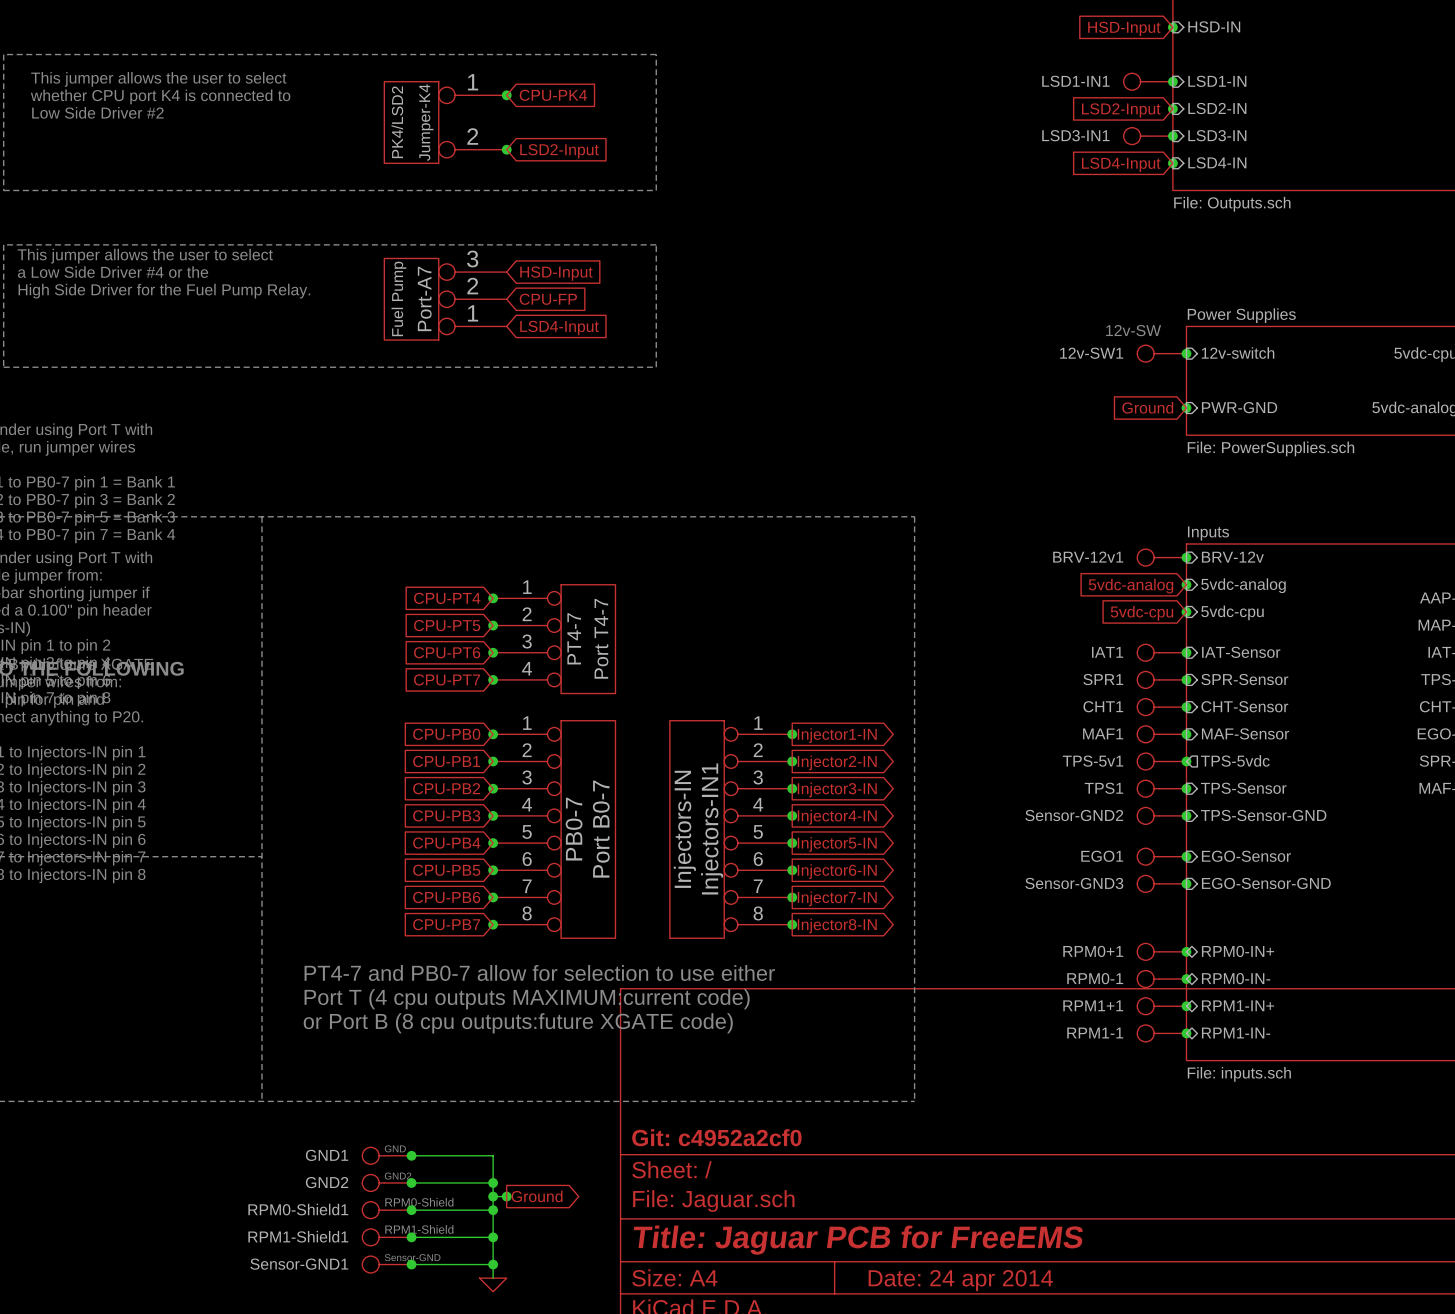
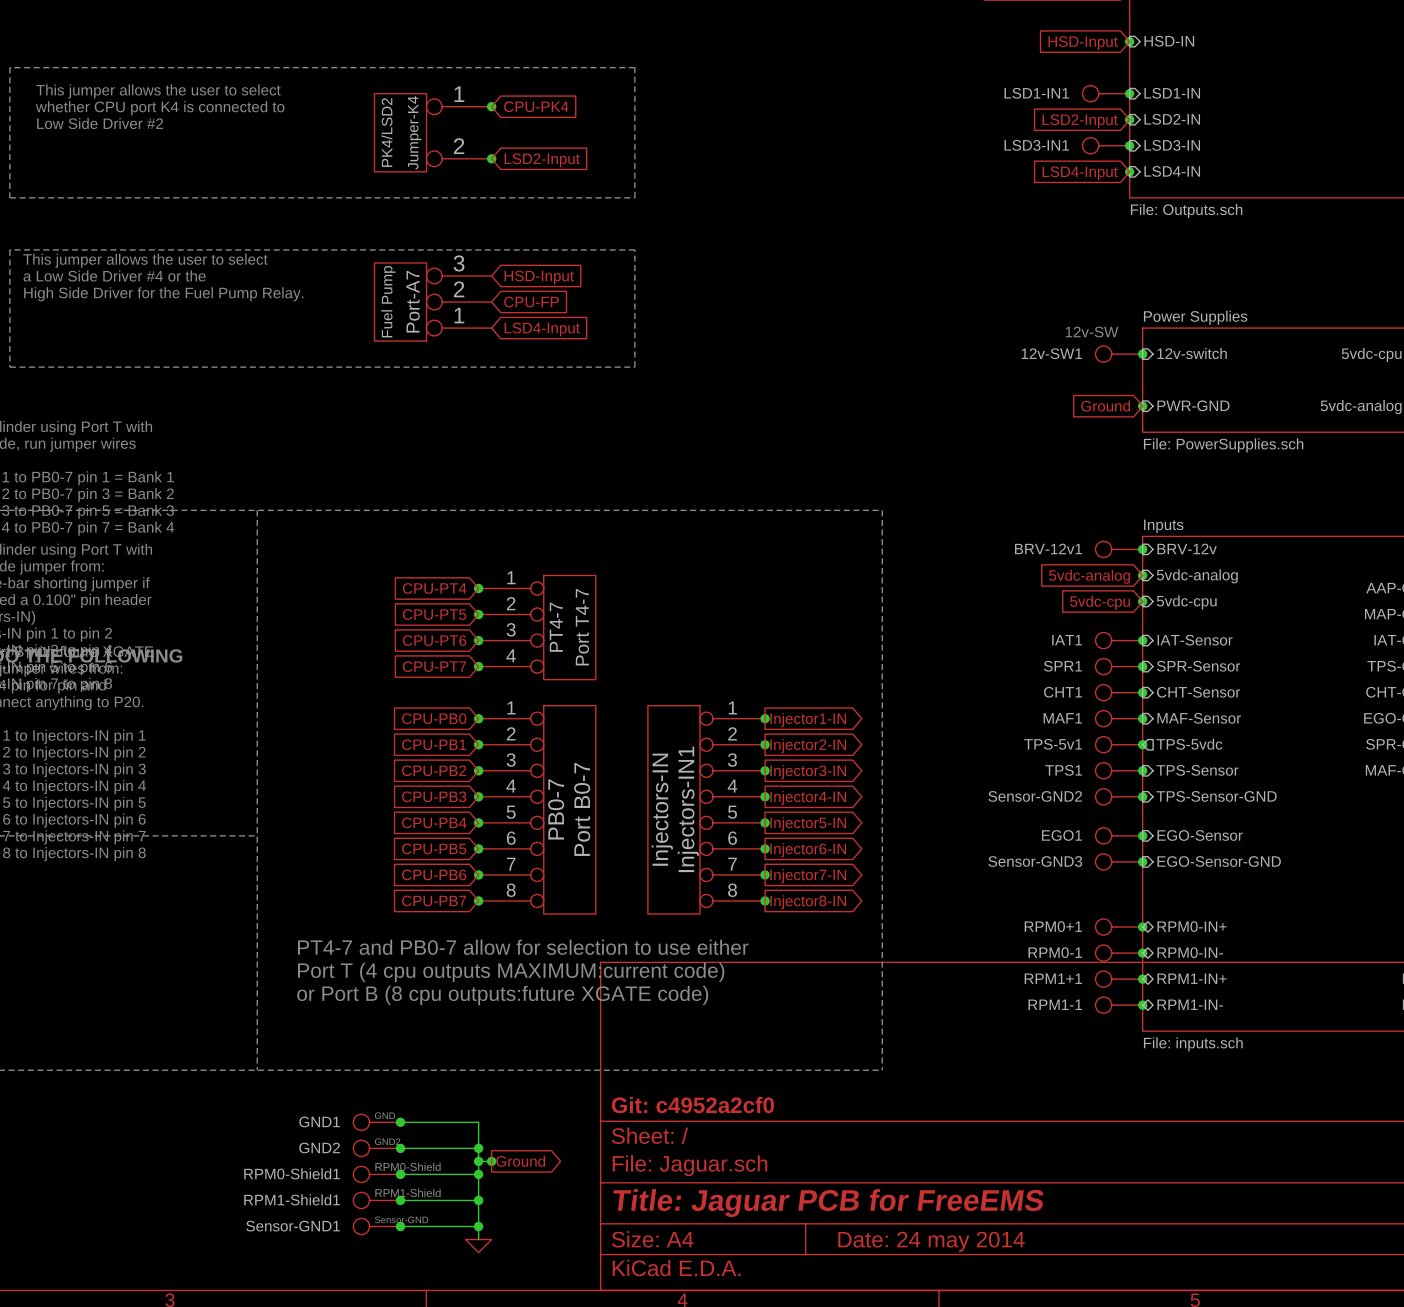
title block: Date: 24 apr 2014 (960, 1280) -> Date: 24 may 2014 (931, 1241)

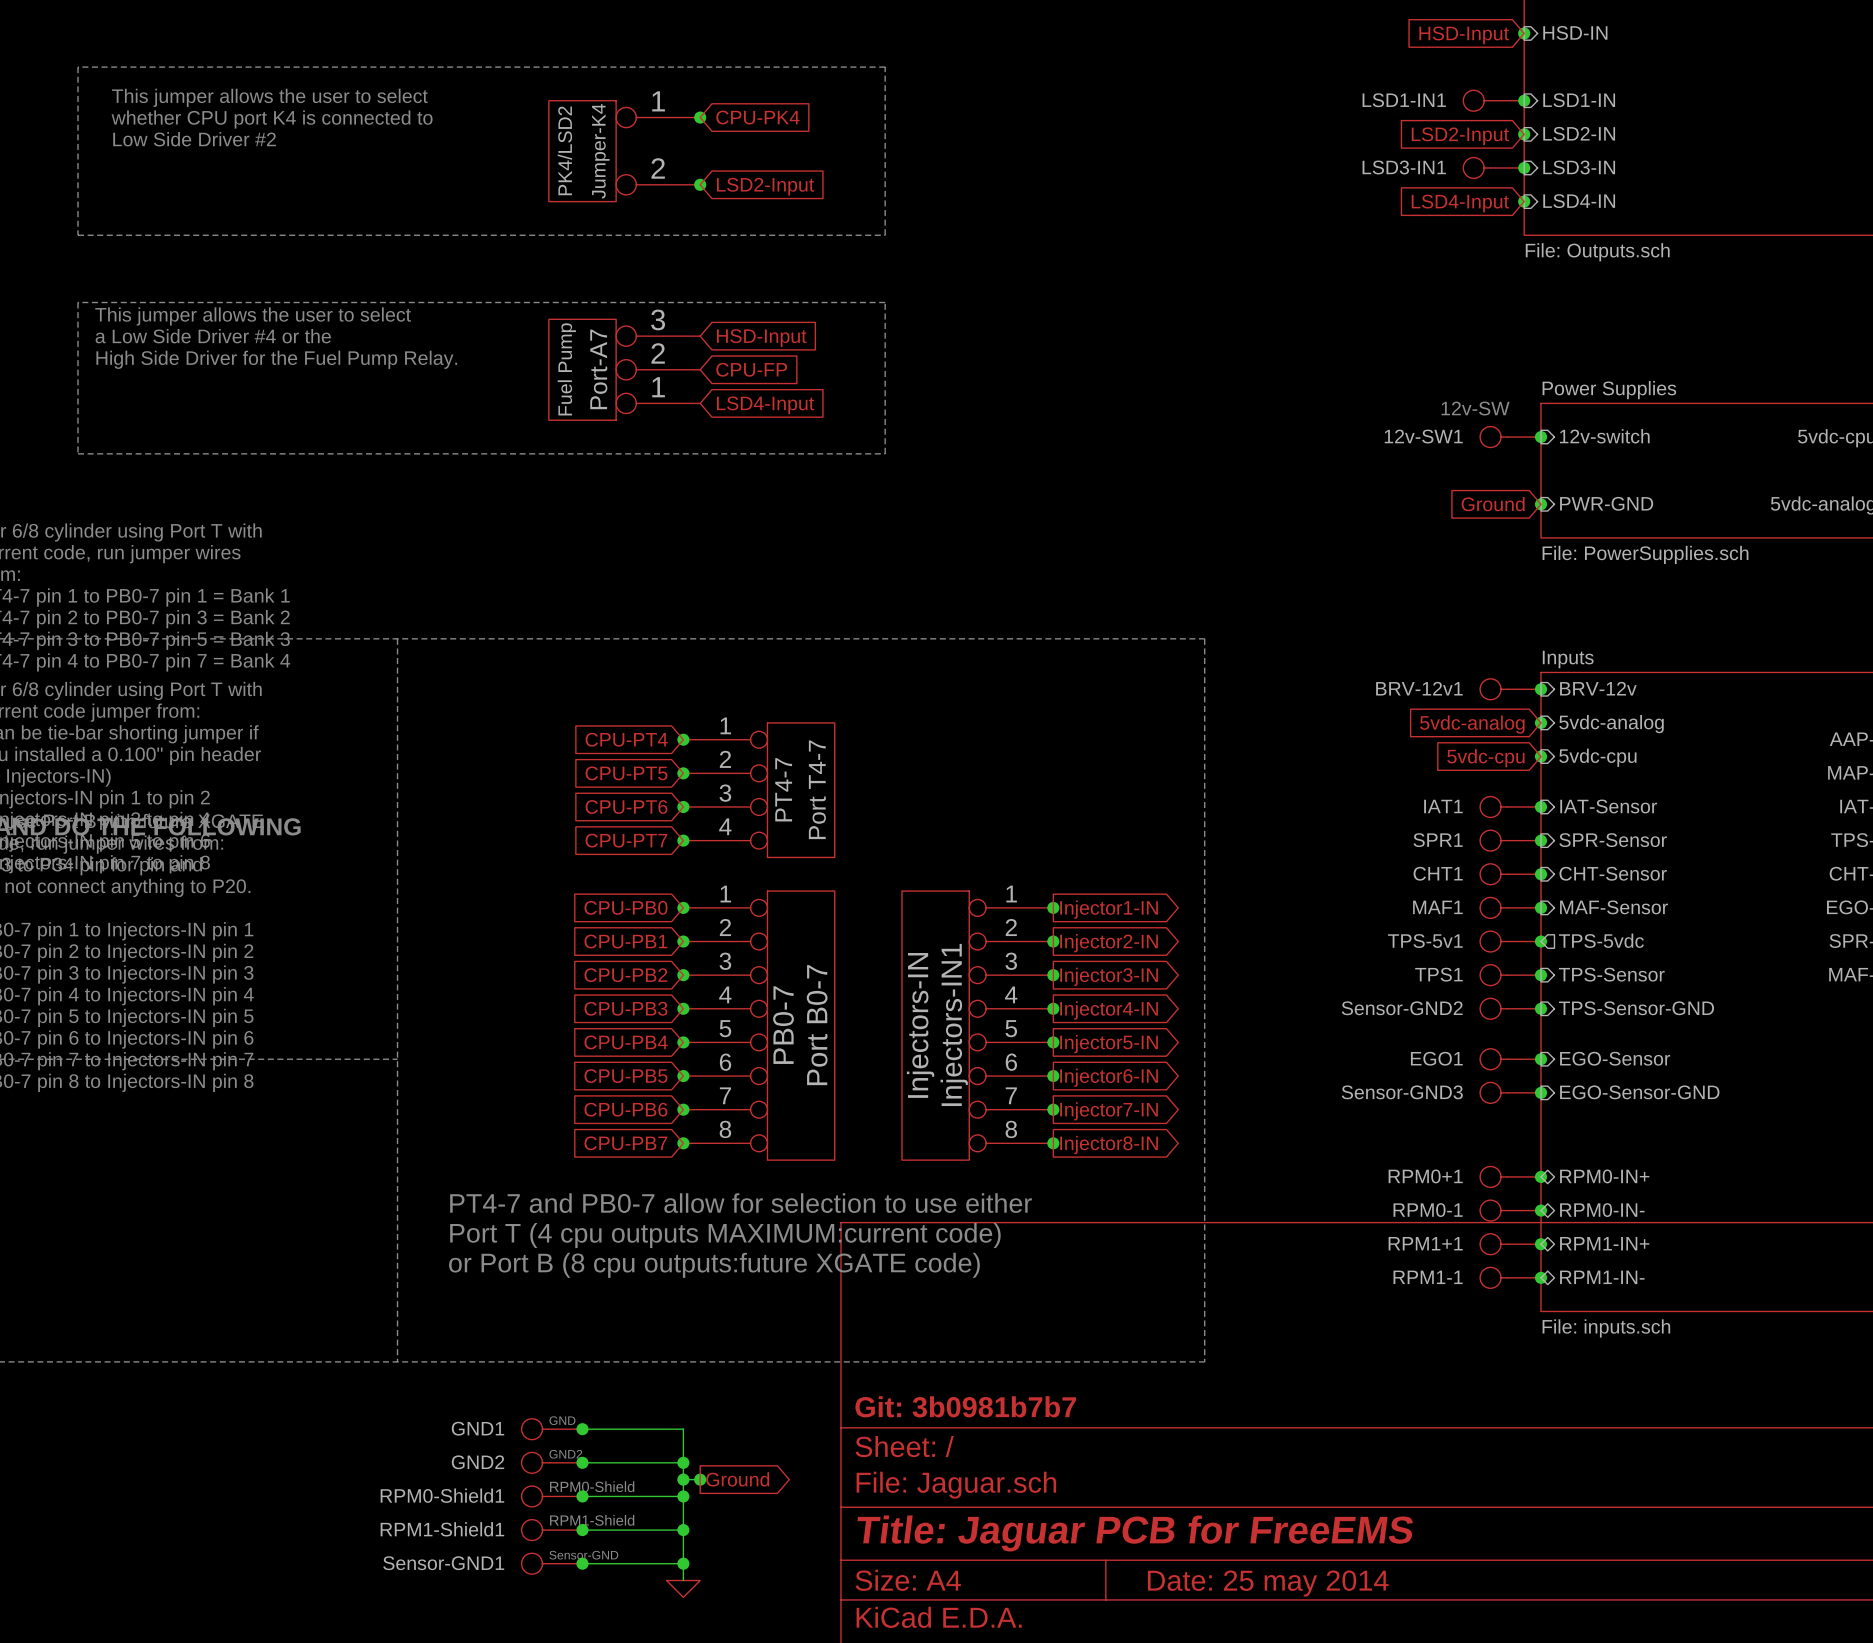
title block: Git: c4952a2cf0 (692, 1105) -> Git: 3b0981b7b7 (965, 1406)
title block: Date: 24 may 2014 (931, 1241) -> Date: 25 may 2014 (1268, 1583)

